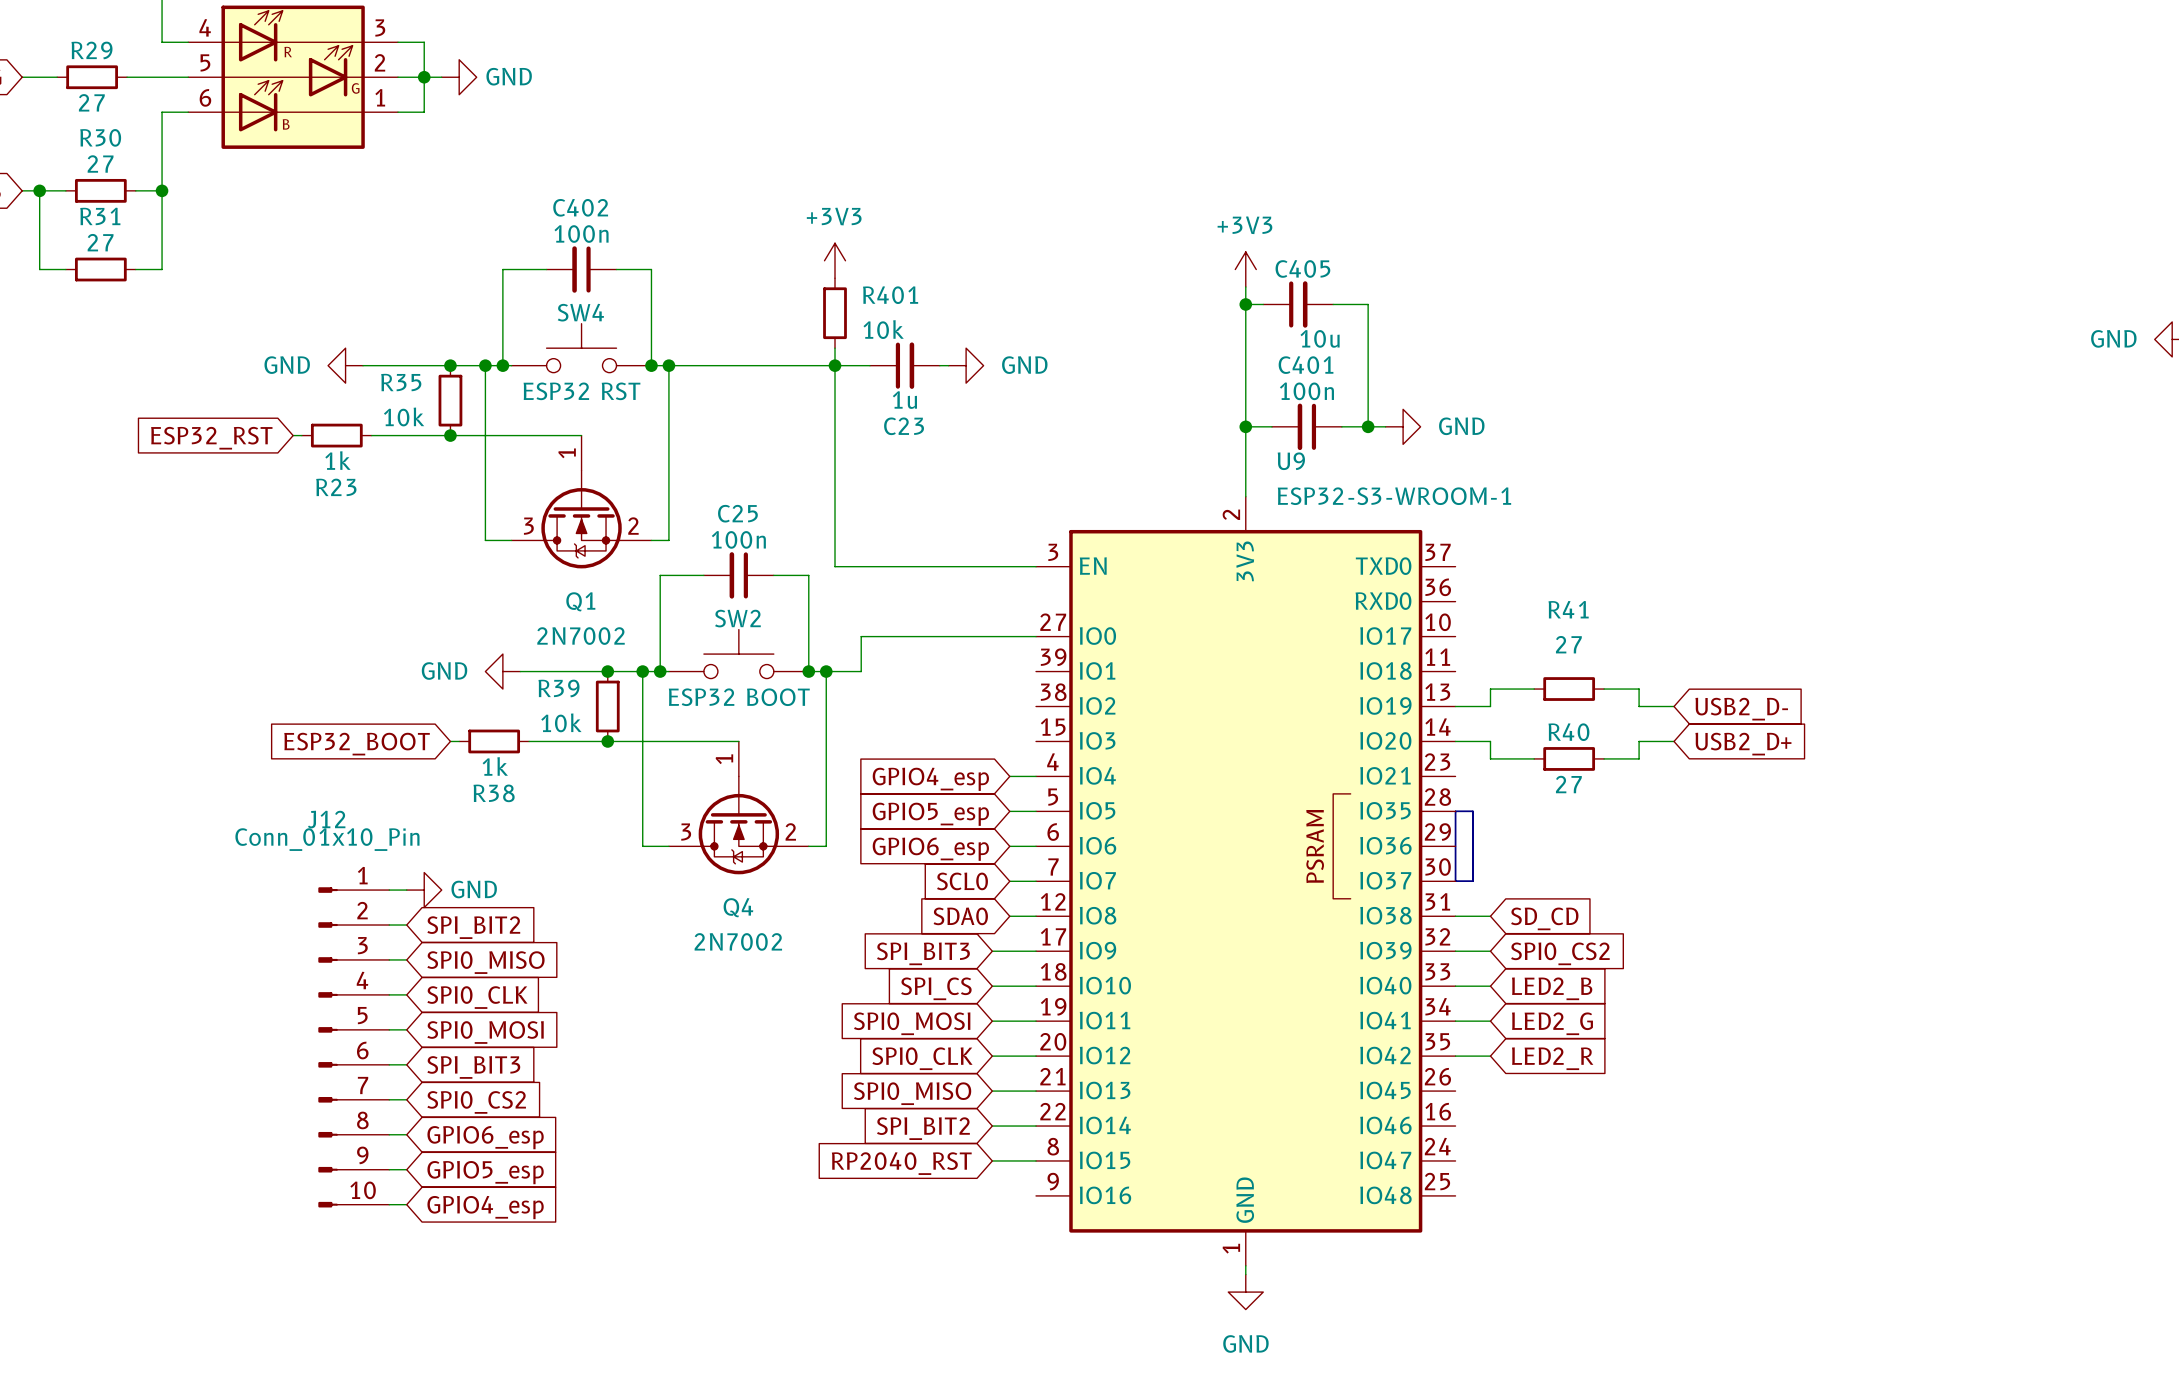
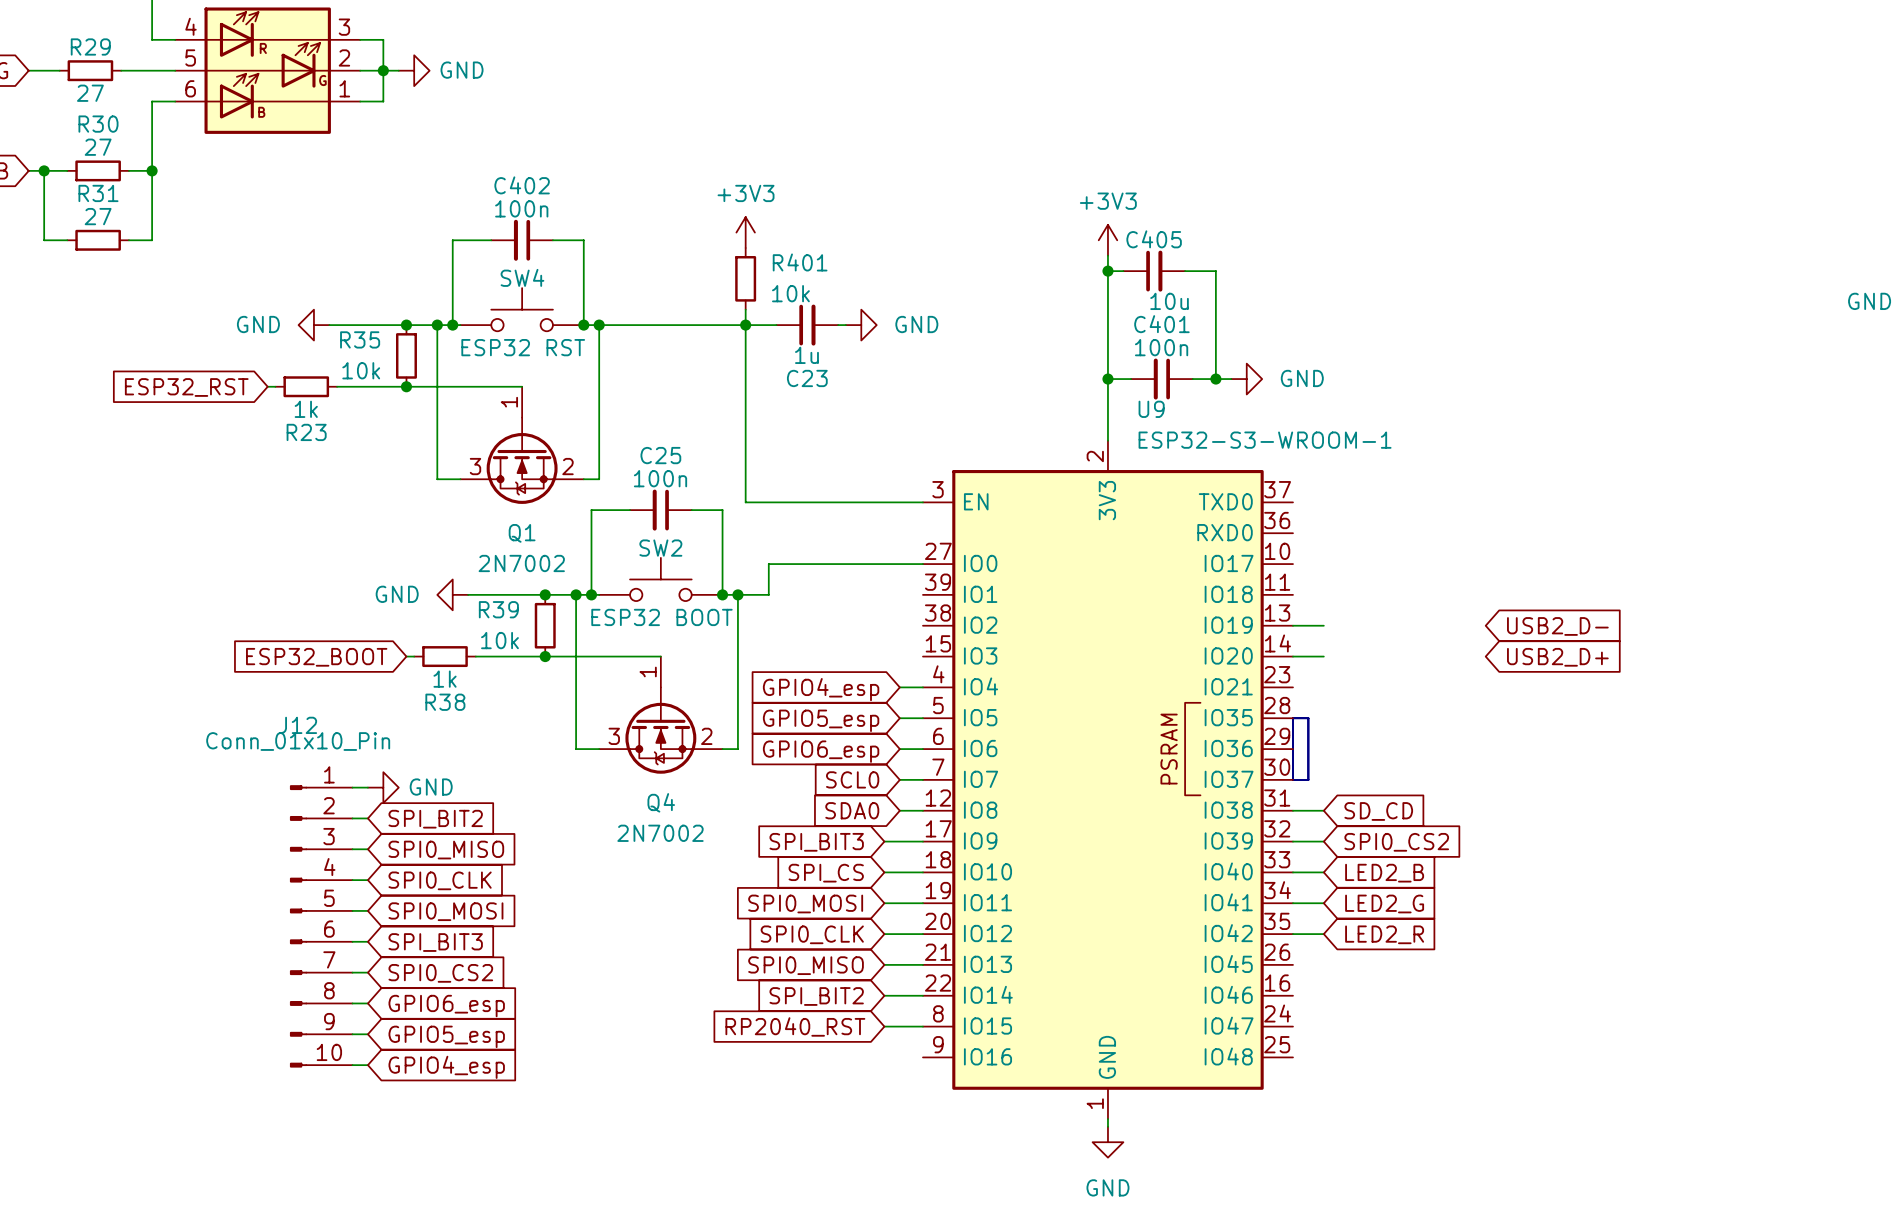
wire: (1534, 689) (1490, 689) (1490, 706) -> none
R41: 27 (1569, 689) -> none
wire: (1604, 689) (1639, 689) (1639, 706) (1674, 706) -> none
wire: (1490, 741) (1490, 758) (1534, 758) -> none
wire: (1674, 741) (1639, 741) (1639, 758) (1604, 758) -> none
R40: 27 (1569, 758) -> none

